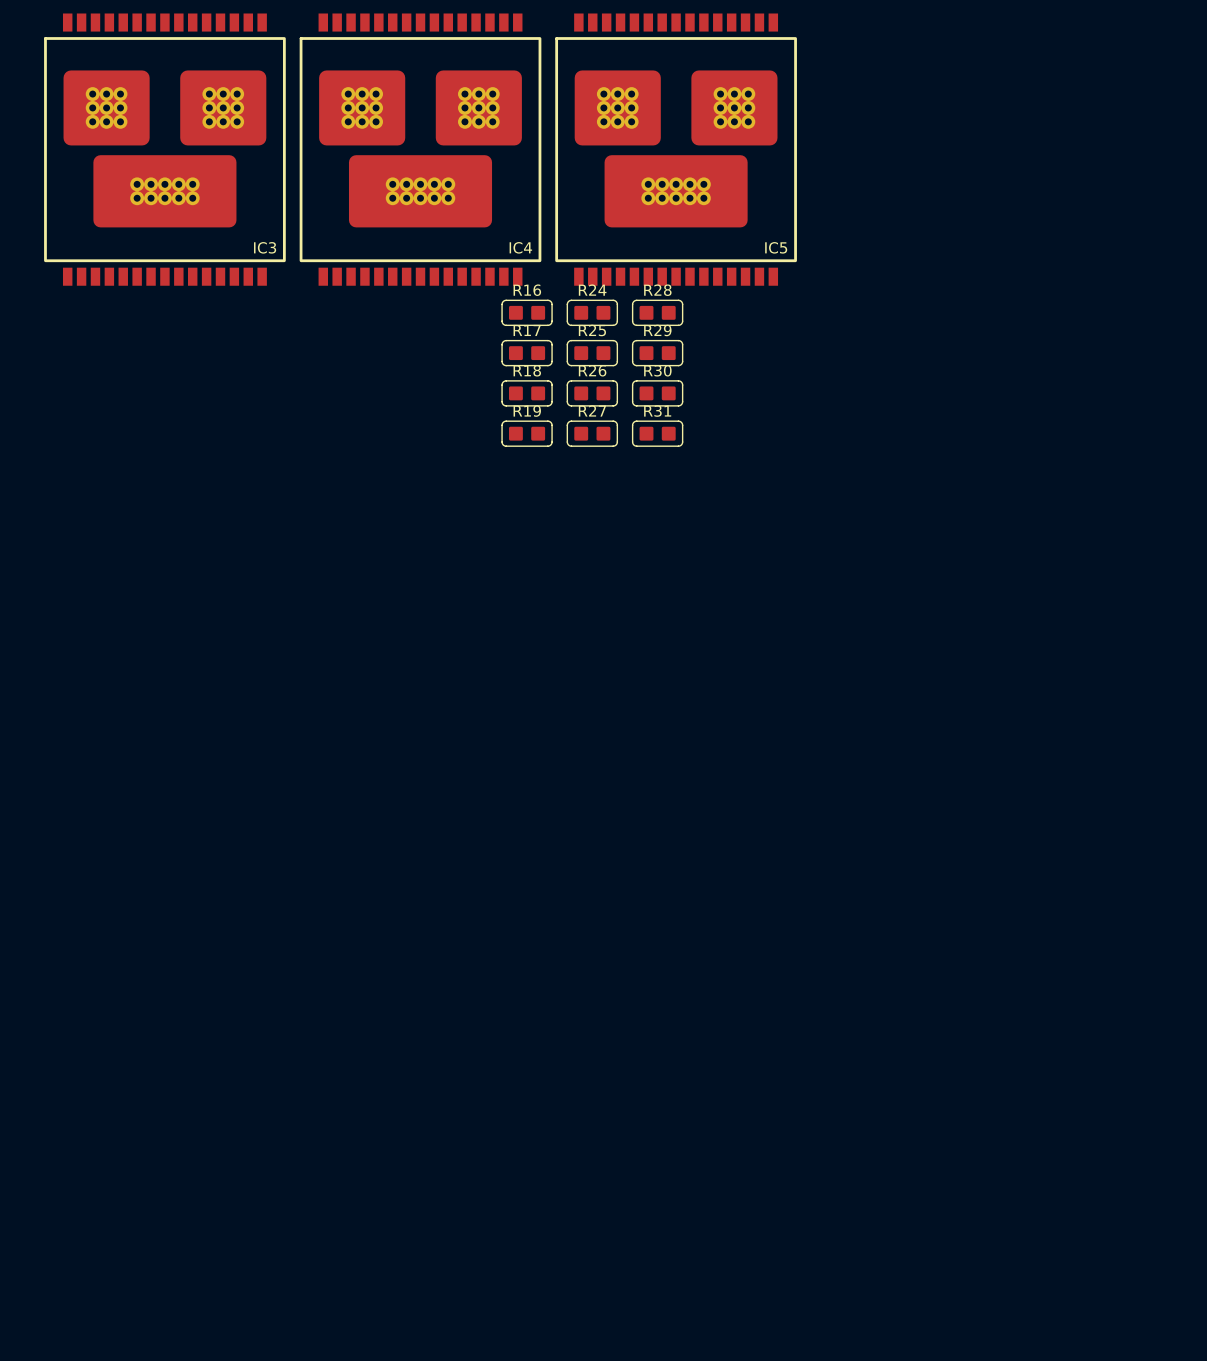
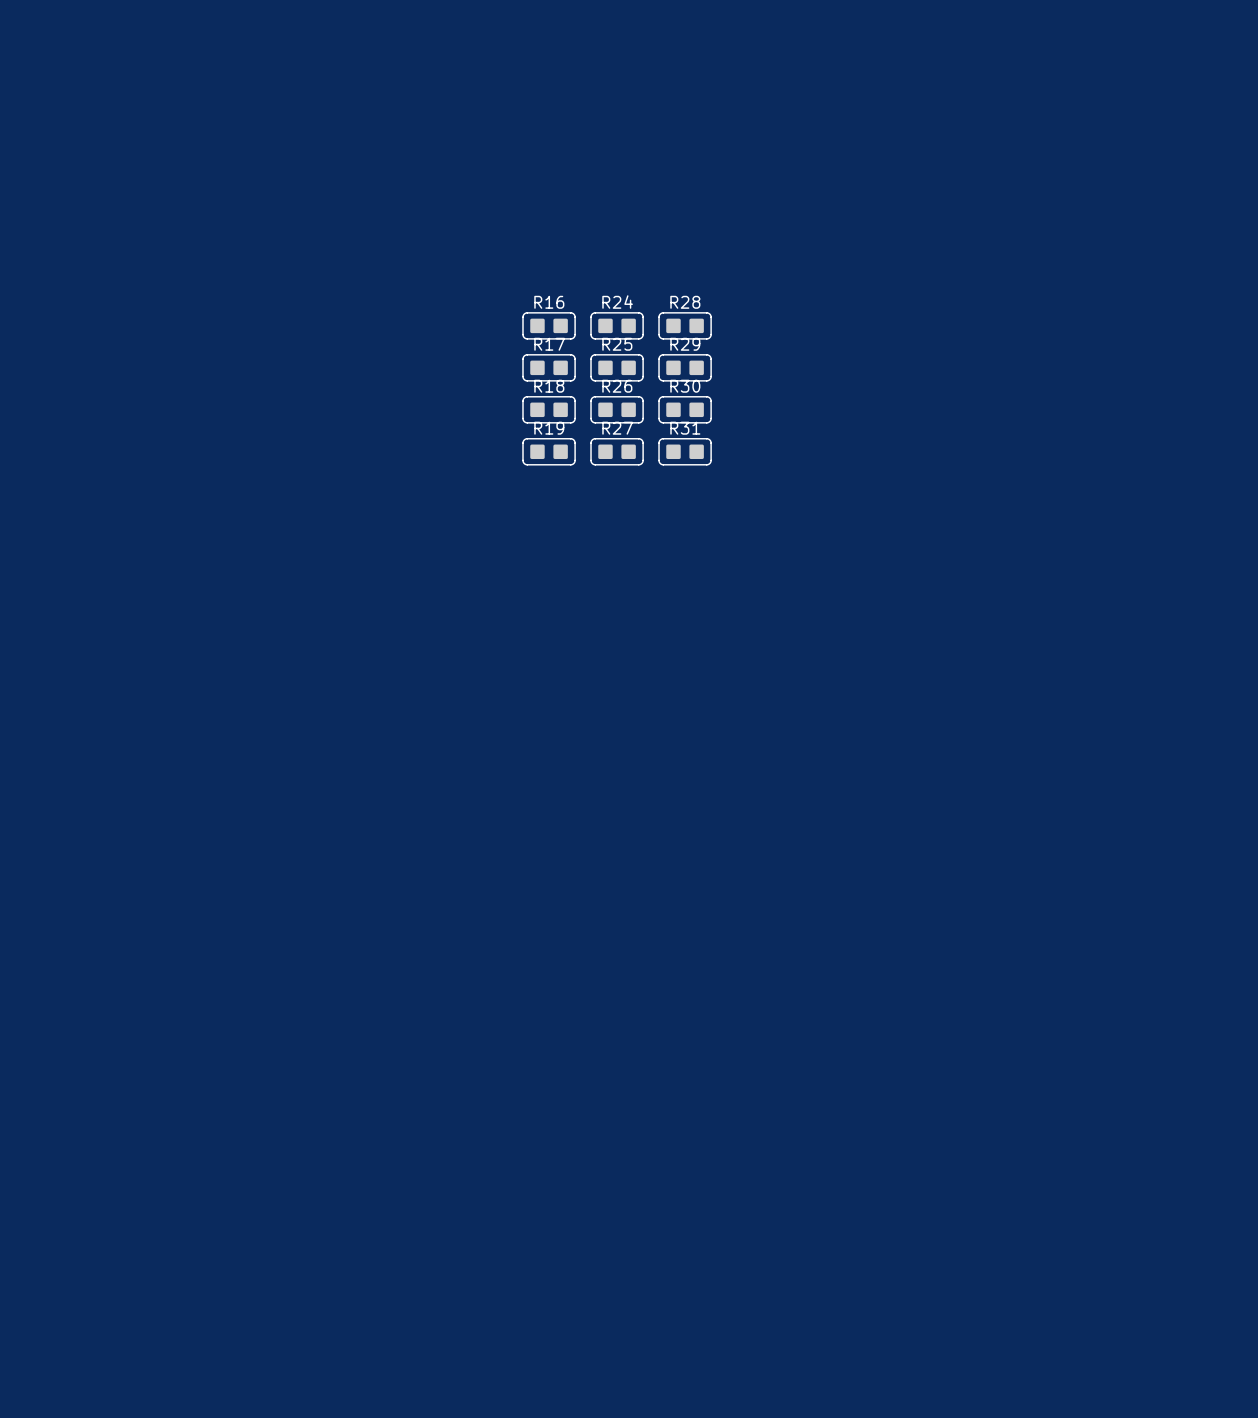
IC3: (164, 149) -> none
IC4: (420, 149) -> none
IC5: (676, 149) -> none

